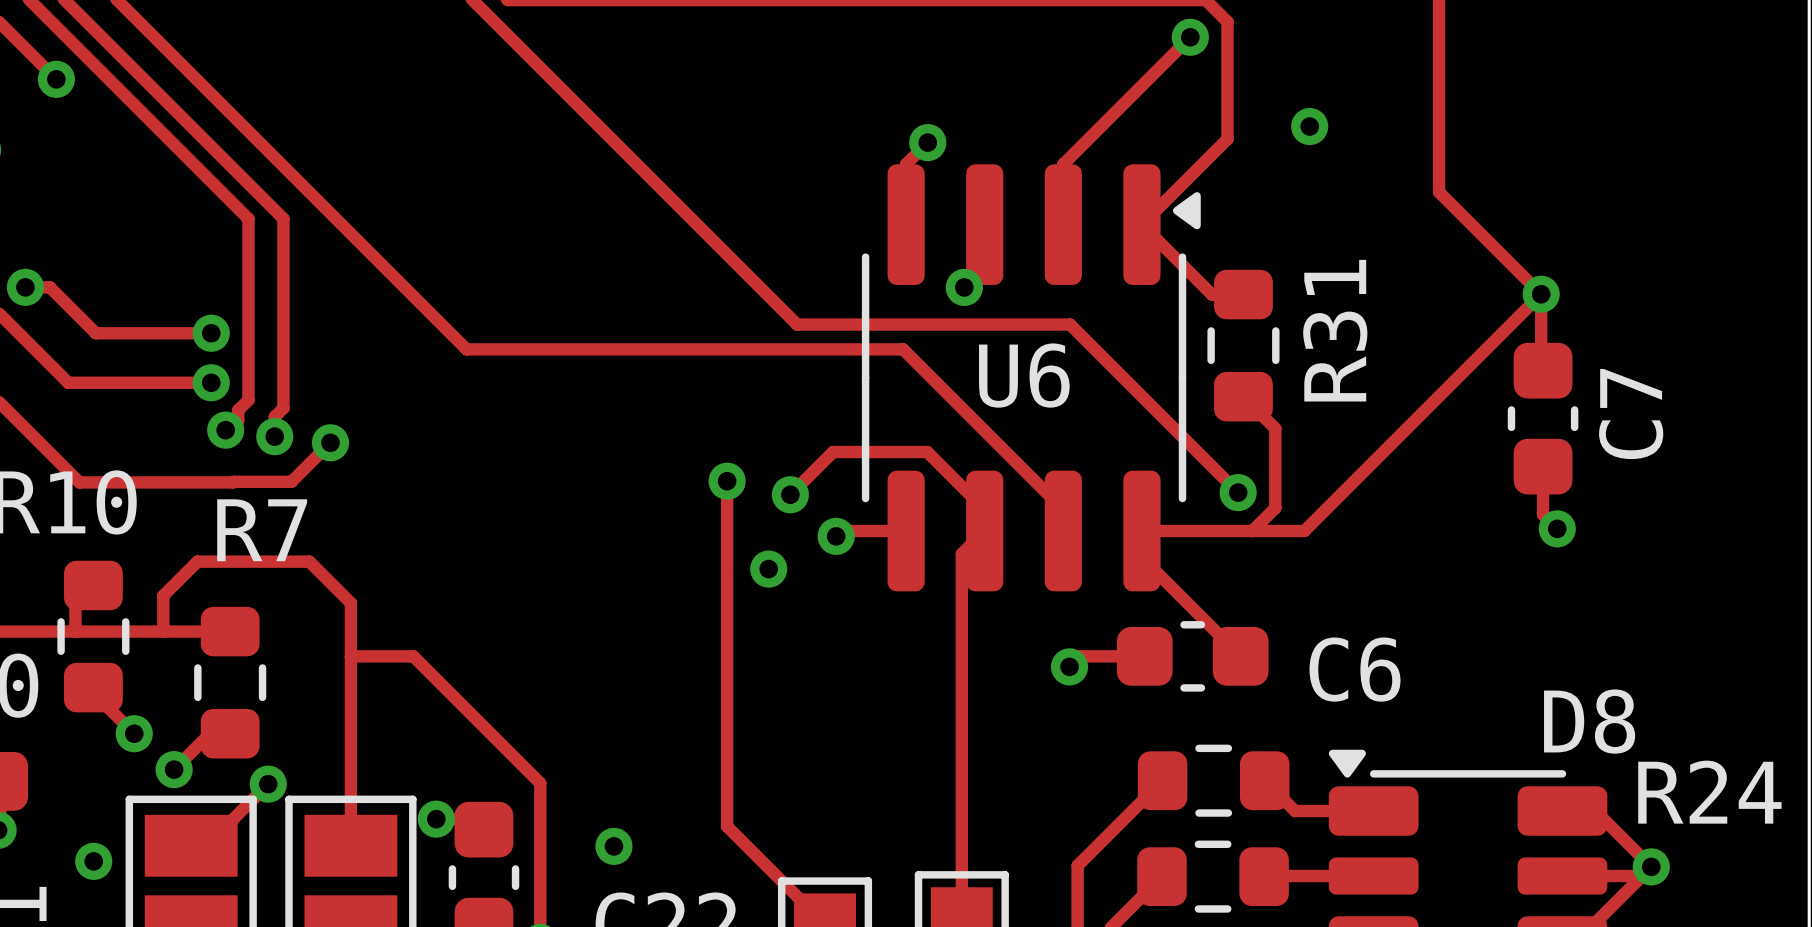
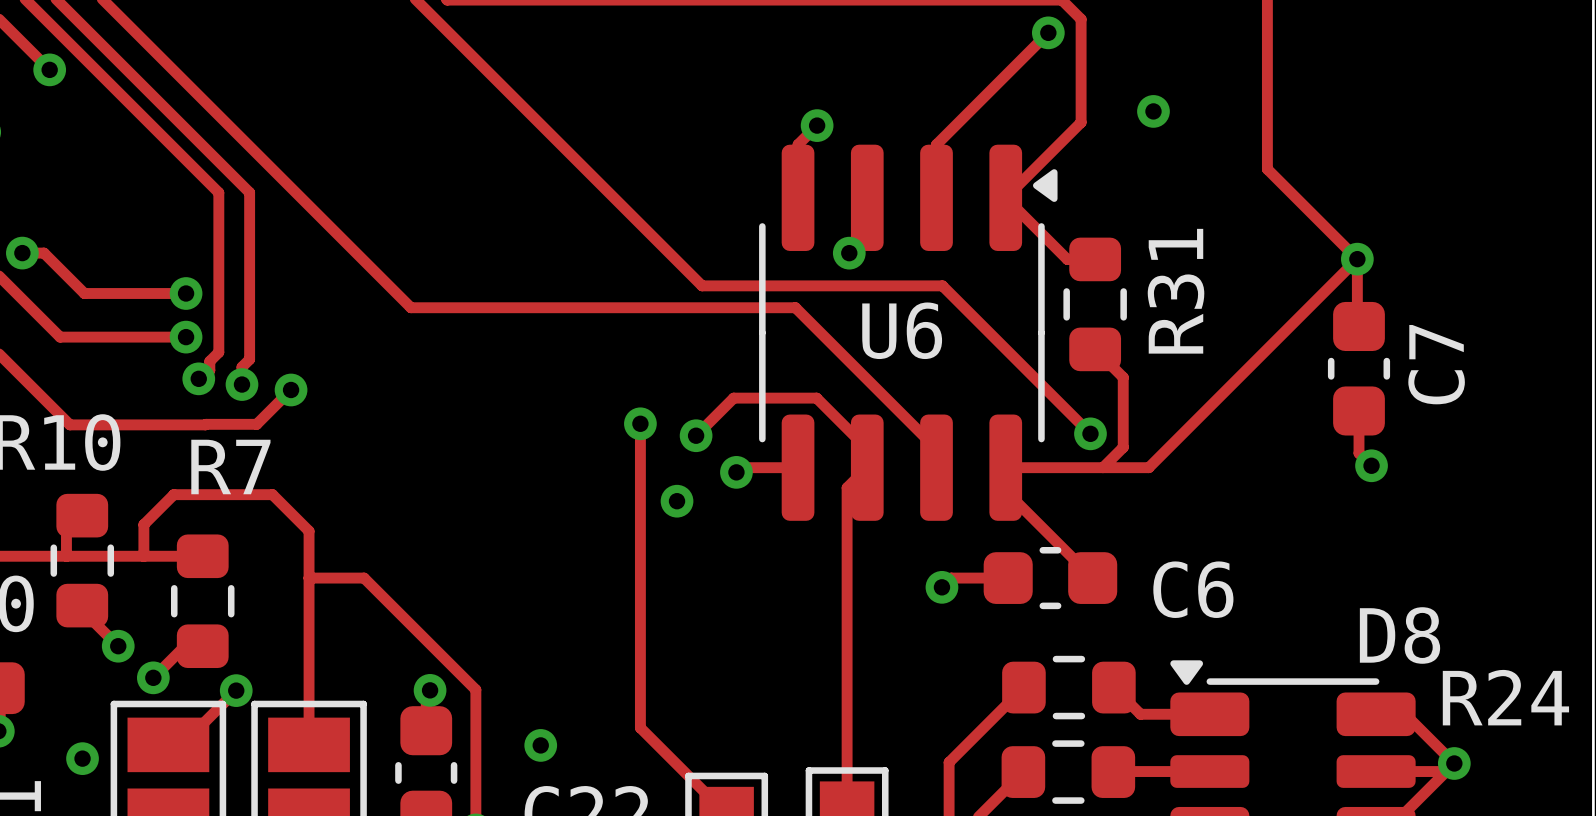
via position: (436, 819) -> (430, 690)

